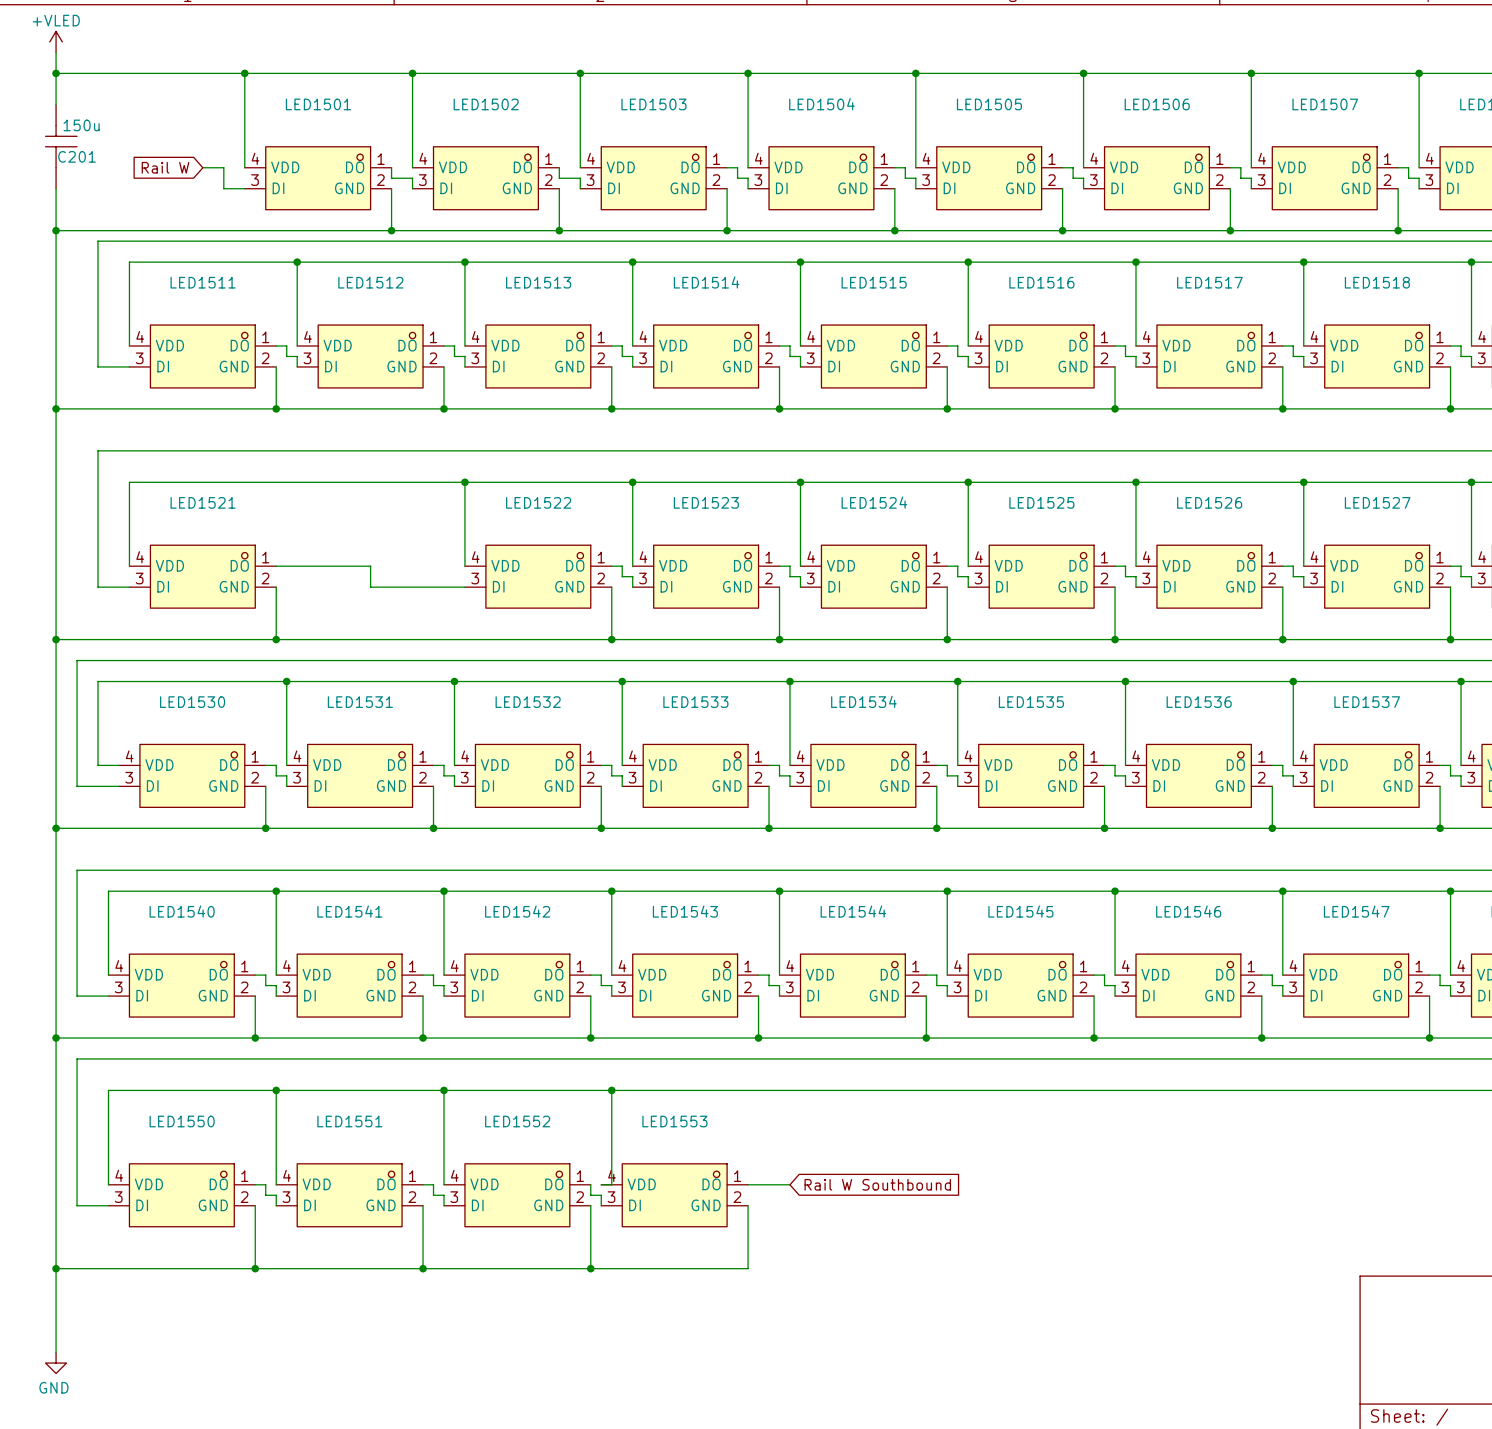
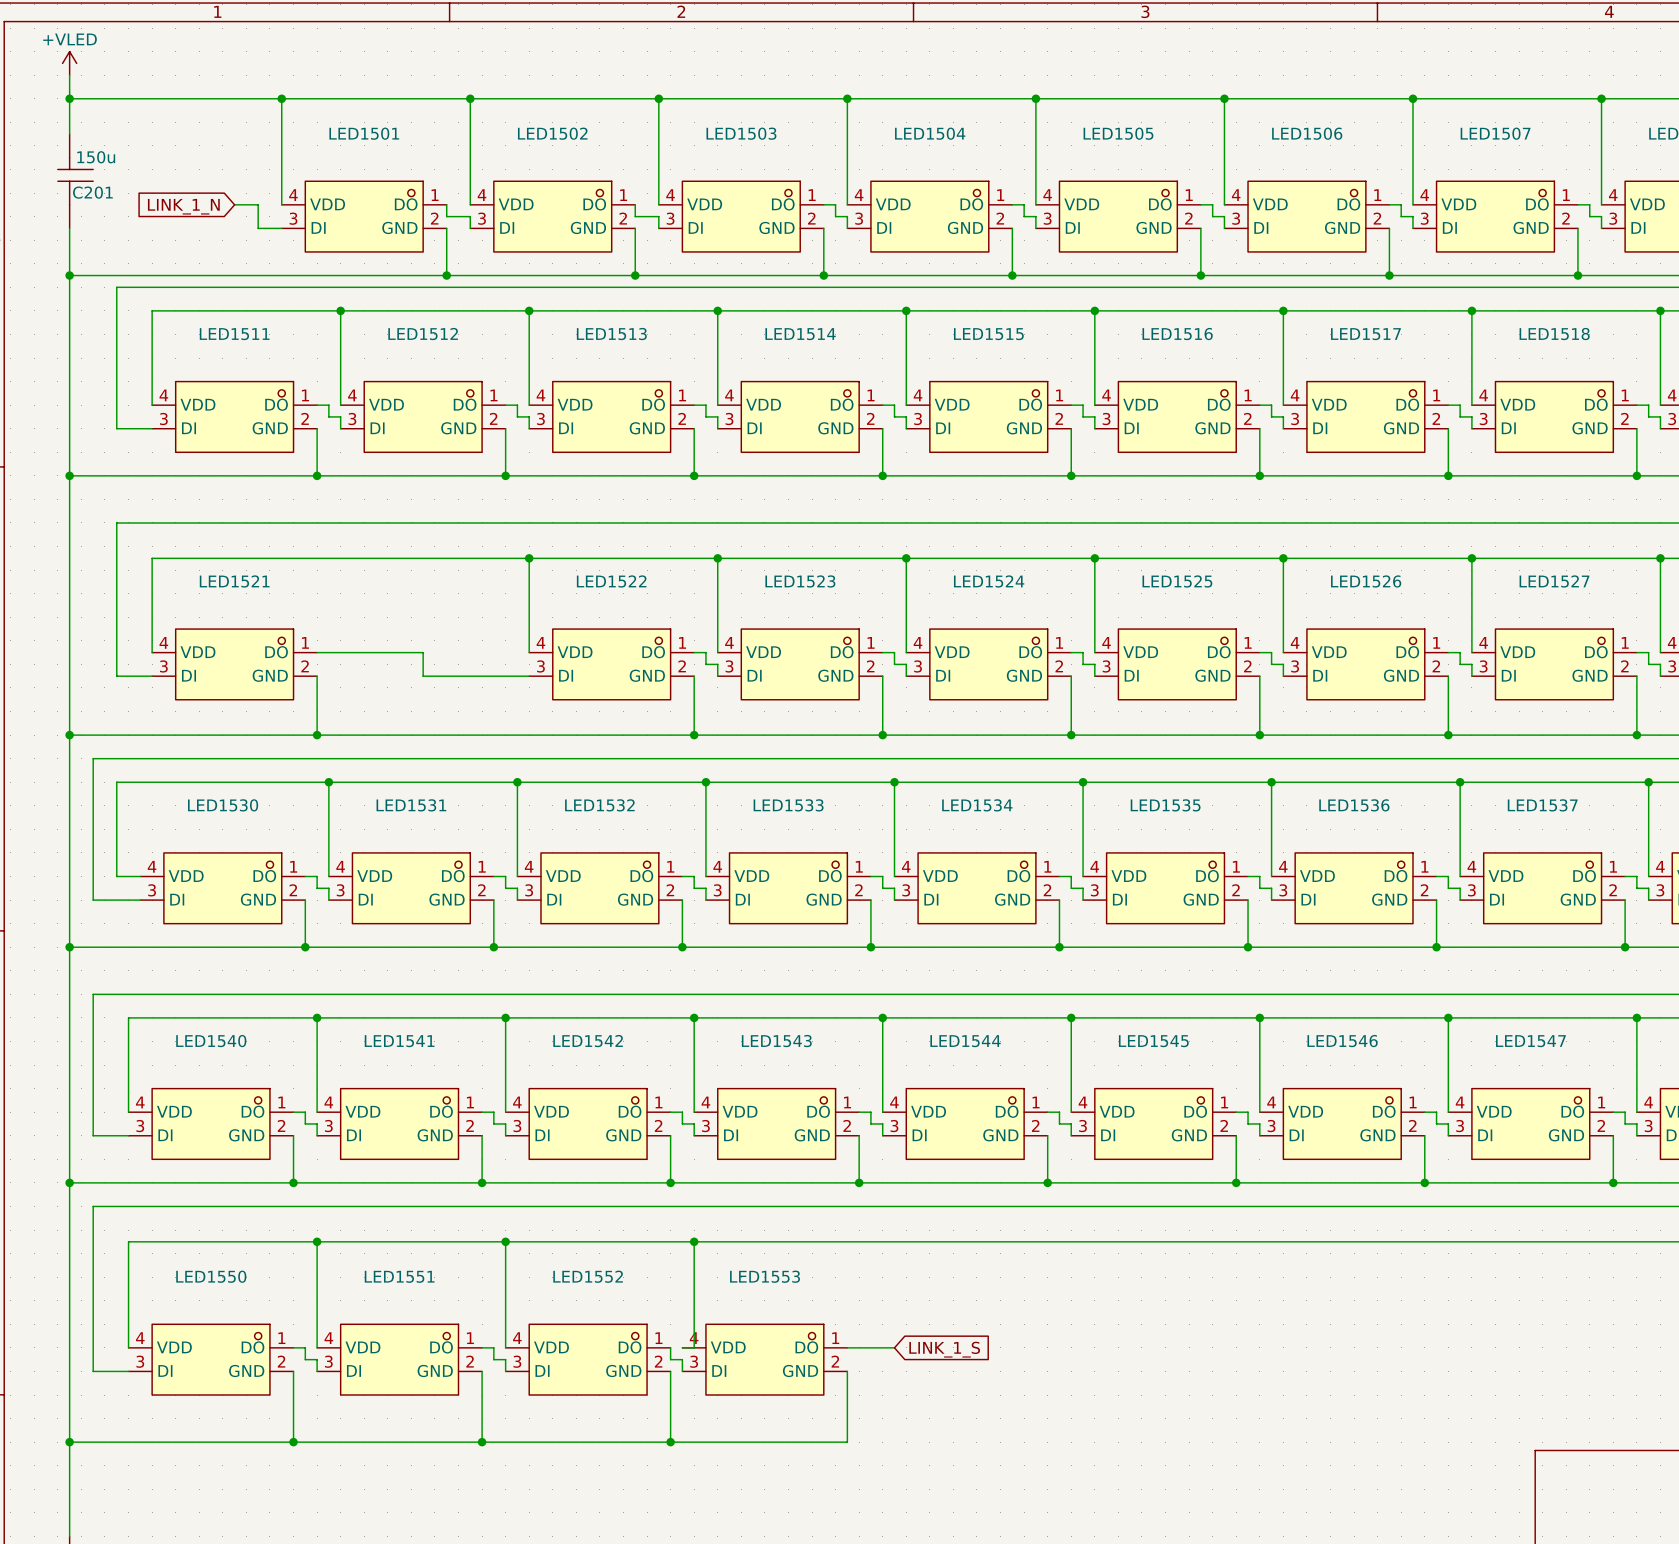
global label: Rail W (165, 167) -> LINK_1_N (183, 206)
global label: Rail W Southbound (877, 1184) -> LINK_1_S (944, 1349)

